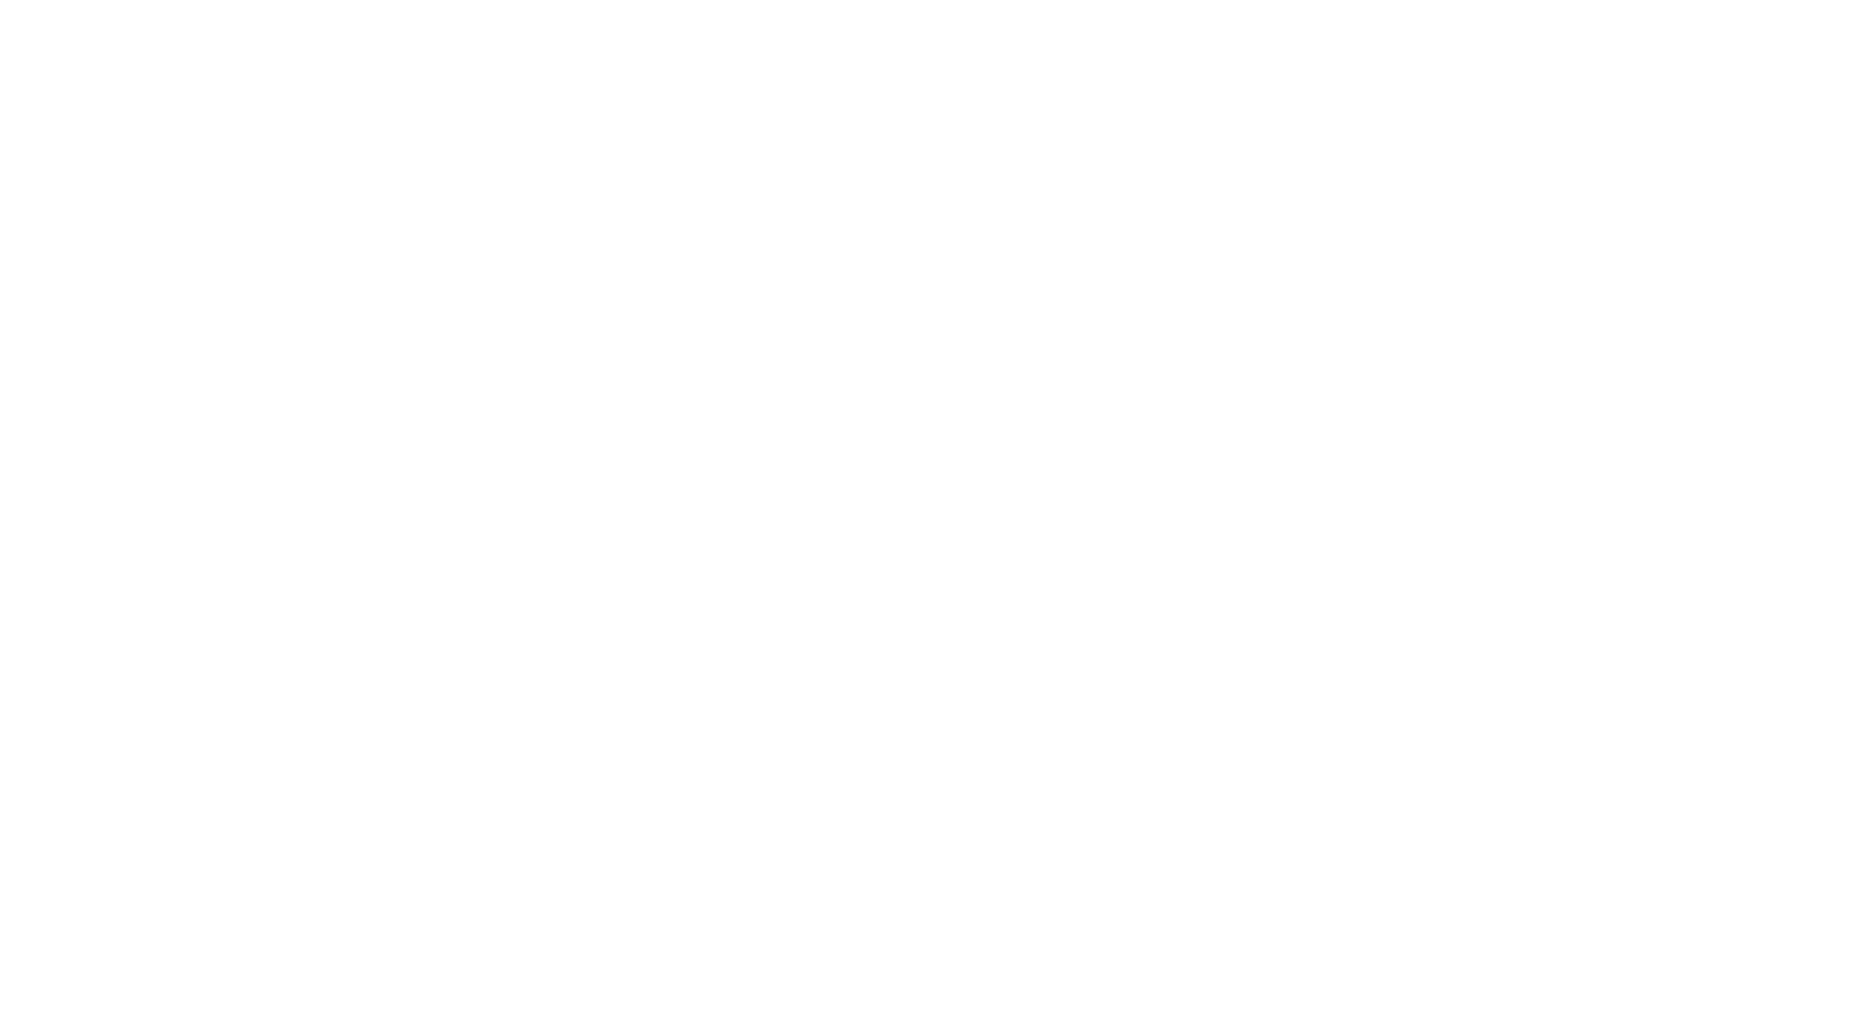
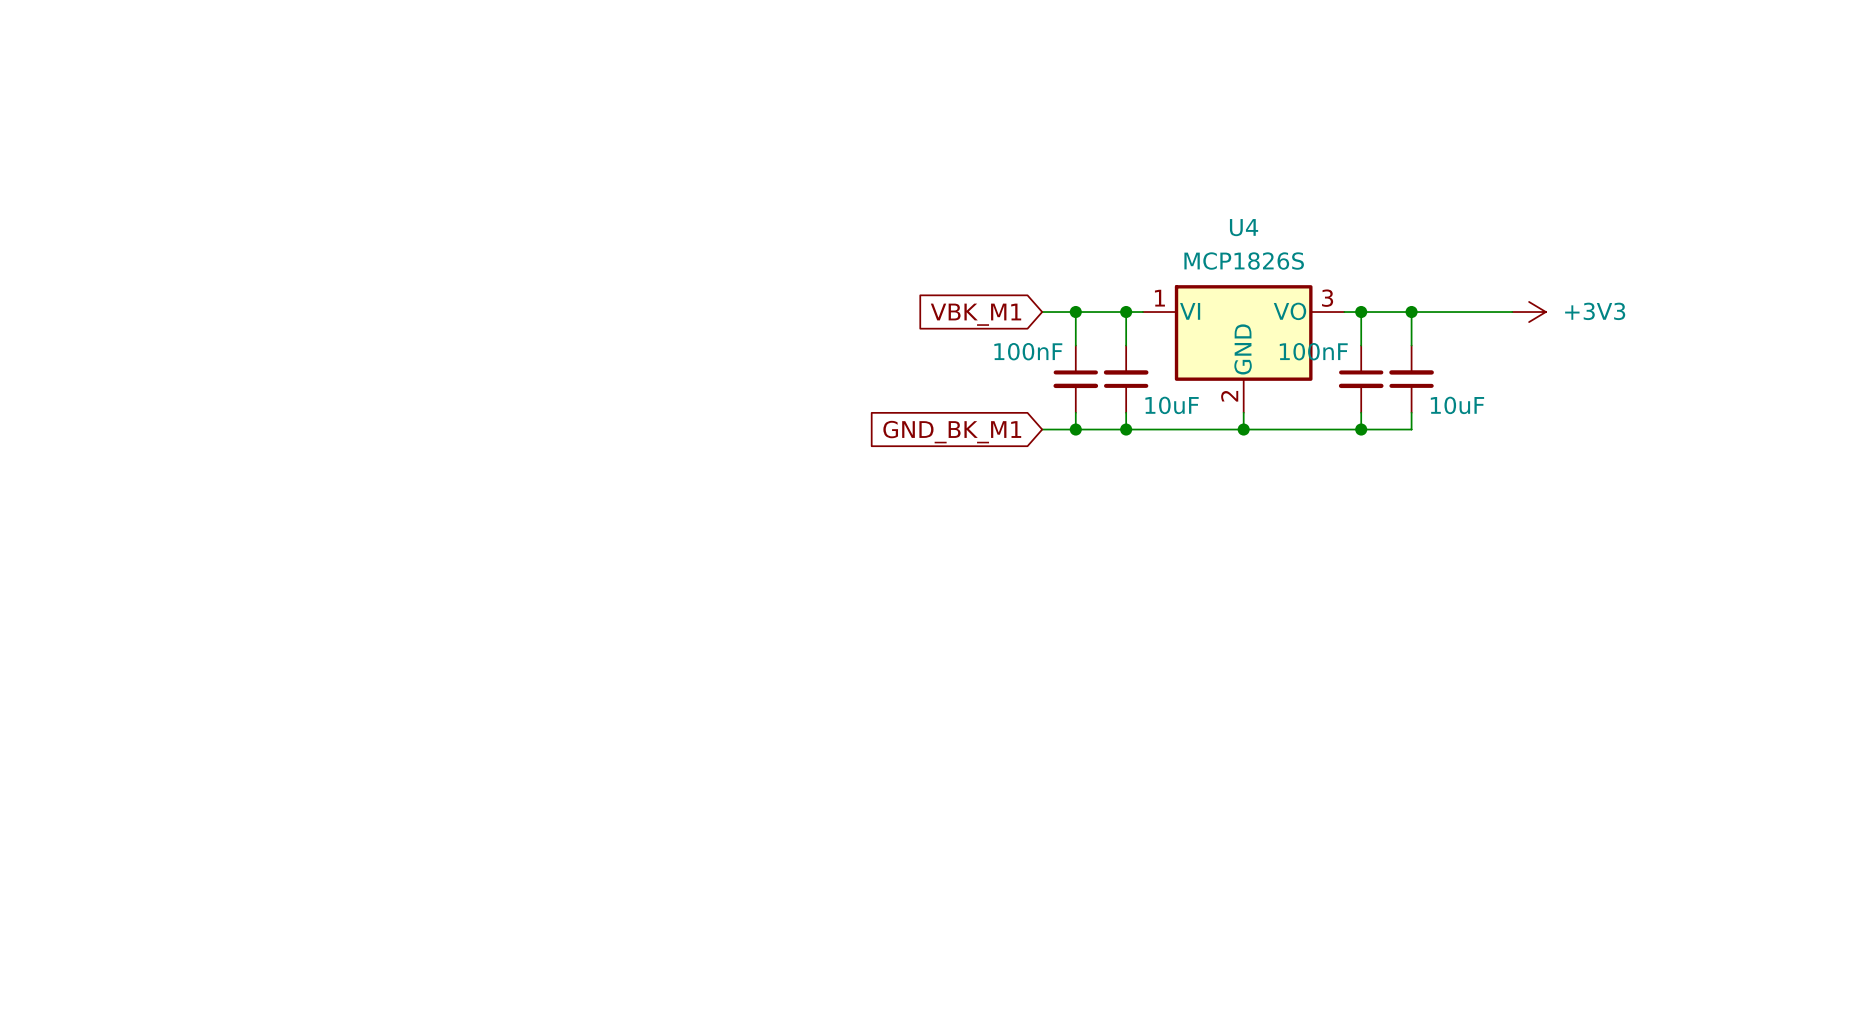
global label: none -> VBK_M1 (976, 314)
wire: none -> (1042, 312) (1142, 312)
wire: none -> (1075, 312) (1075, 345)
junction: none -> (1075, 312)
wire: none -> (1126, 312) (1126, 345)
junction: none -> (1126, 312)
wire: none -> (1344, 312) (1512, 312)
wire: none -> (1361, 312) (1361, 345)
junction: none -> (1361, 312)
wire: none -> (1411, 312) (1411, 345)
junction: none -> (1411, 312)
power symbol: none -> +3V3 (1529, 312)
U4: none -> MCP1826S (1243, 348)
part: none -> 100nF (1075, 379)
part: none -> 10uF (1126, 379)
part: none -> 100nF (1361, 379)
part: none -> 10uF (1411, 379)
wire: none -> (1075, 412) (1075, 429)
wire: none -> (1126, 412) (1126, 429)
wire: none -> (1243, 412) (1243, 429)
wire: none -> (1361, 412) (1361, 429)
wire: none -> (1411, 412) (1411, 429) (1042, 429)
junction: none -> (1075, 429)
junction: none -> (1126, 429)
junction: none -> (1243, 429)
junction: none -> (1361, 429)
global label: none -> GND_BK_M1 (952, 432)

